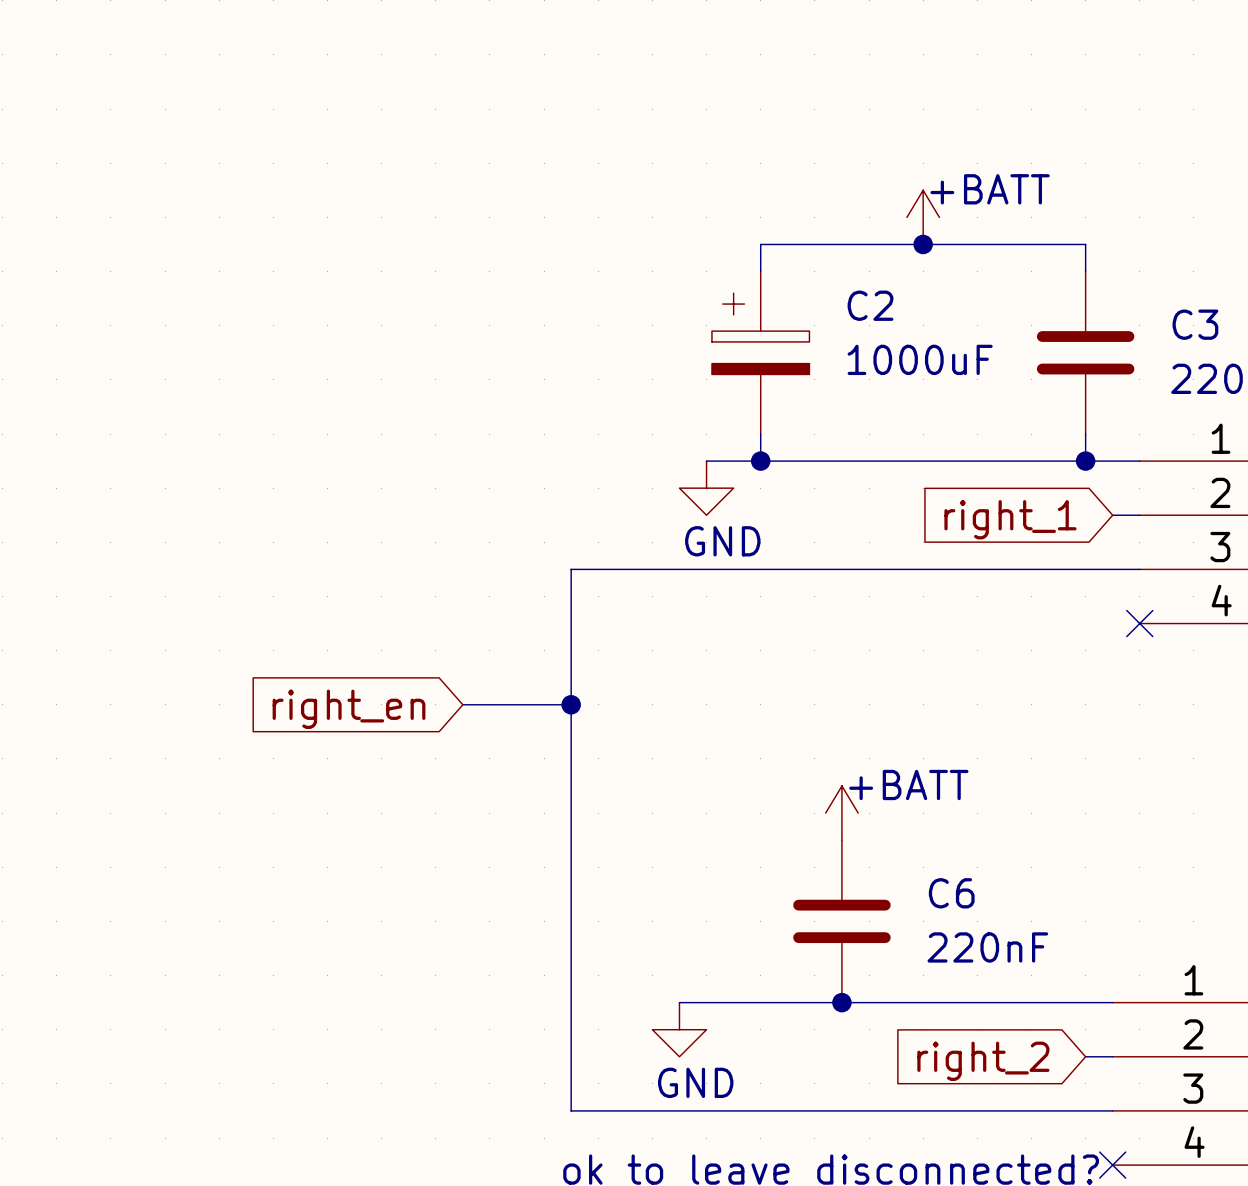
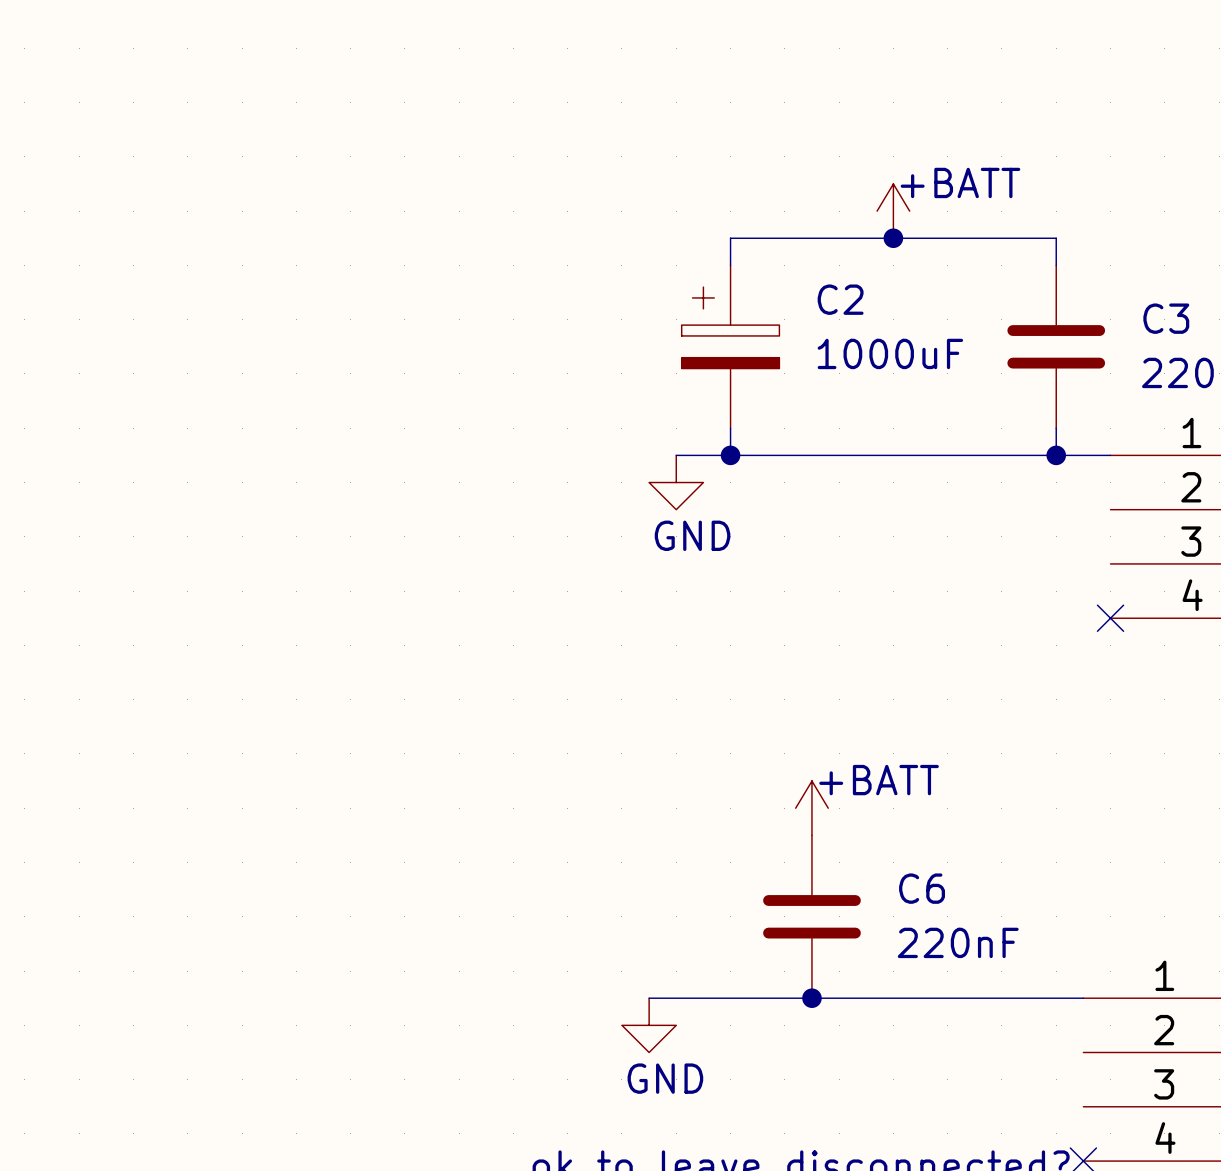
wire: (1112, 515) (1139, 515) -> none
global label: right_1 (1010, 519) -> none
wire: (1139, 569) (571, 569) (571, 1110) (1112, 1110) -> none
wire: (462, 704) (571, 704) -> none
junction: (571, 704) -> none
global label: right_en (349, 709) -> none
wire: (1085, 1056) (1112, 1056) -> none
global label: right_2 (983, 1061) -> none

